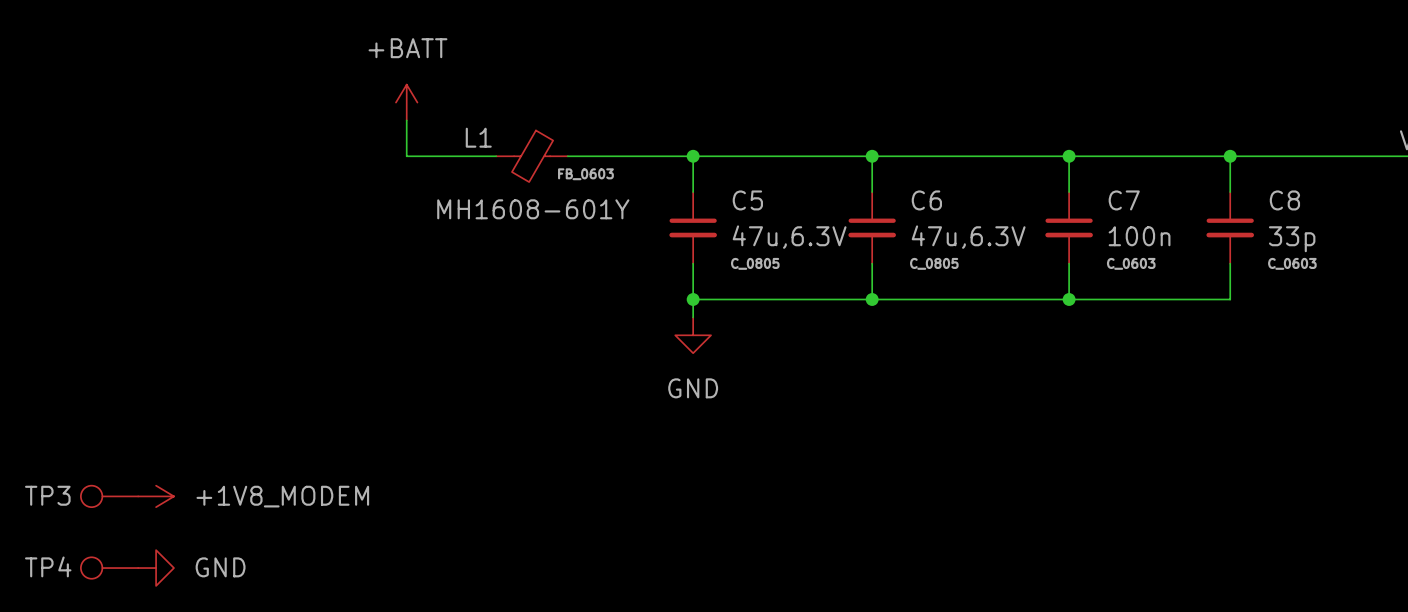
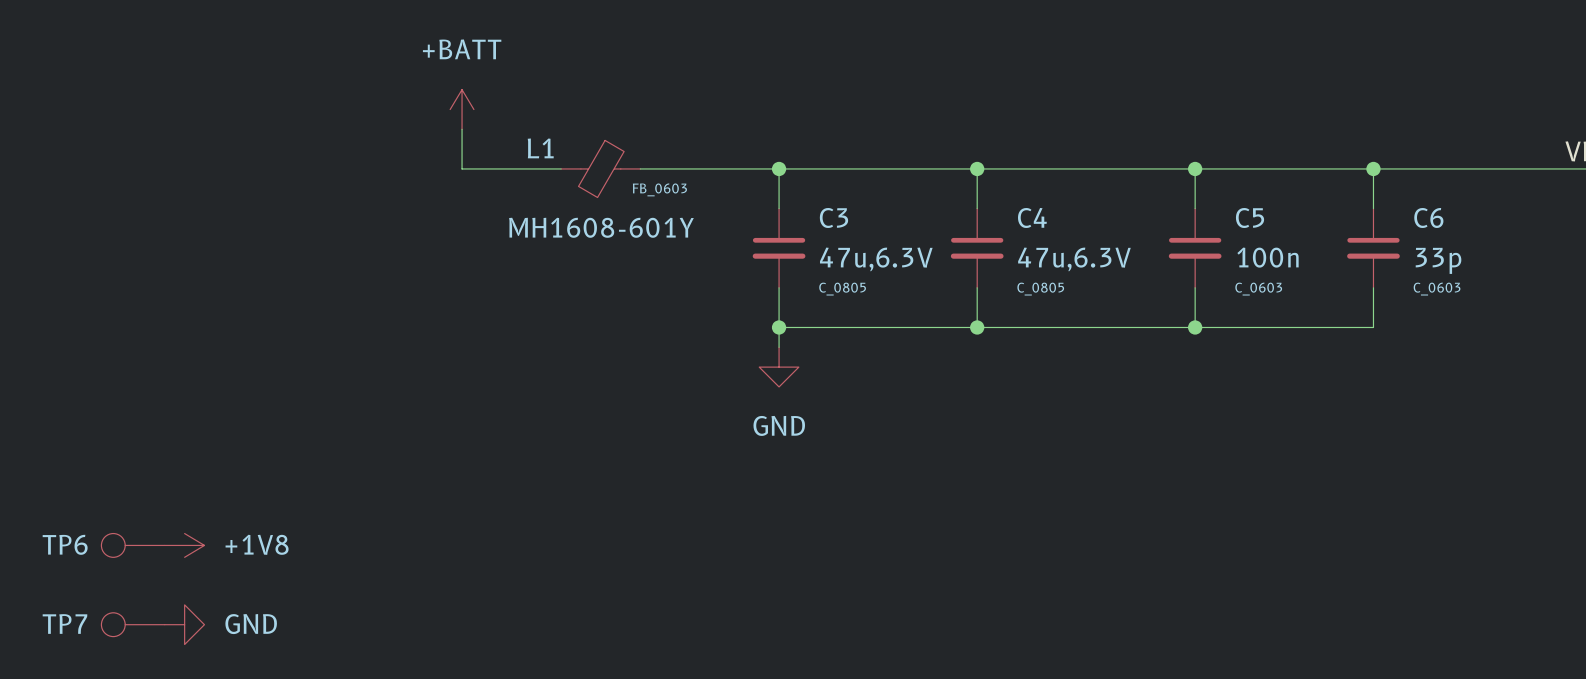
C5 name: C5 (747, 200) -> C3 (833, 217)
C6 name: C6 (926, 200) -> C4 (1032, 217)
C7 name: C7 (1124, 200) -> C5 (1250, 217)
C8 name: C8 (1284, 200) -> C6 (1428, 217)
TP3 name: TP3 (47, 495) -> TP6 (65, 544)
power symbol: +1V8_MODEM (156, 496) -> +1V8 (184, 545)
TP4 name: TP4 (48, 566) -> TP7 (64, 624)

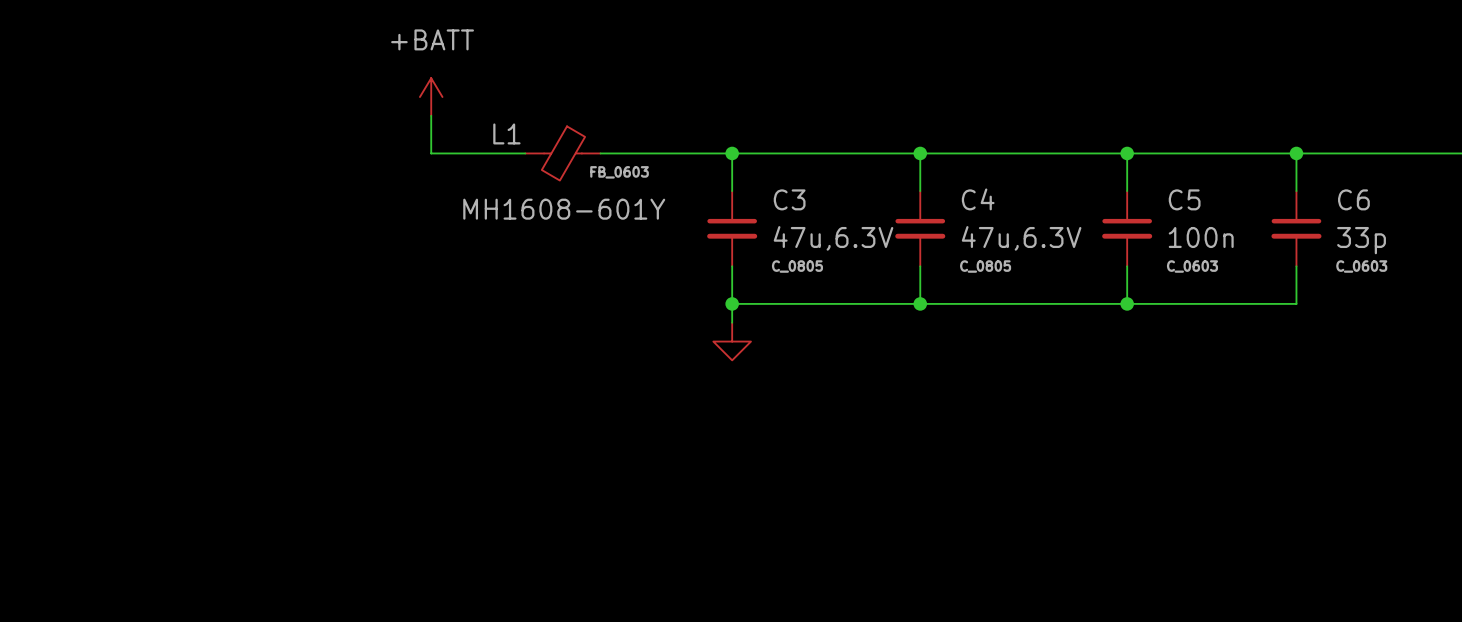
power symbol text: GND (779, 425) -> none
TP6: (133, 545) -> none
power symbol: +1V8 (184, 545) -> none
TP7: (133, 624) -> none
power symbol: GND (184, 624) -> none

